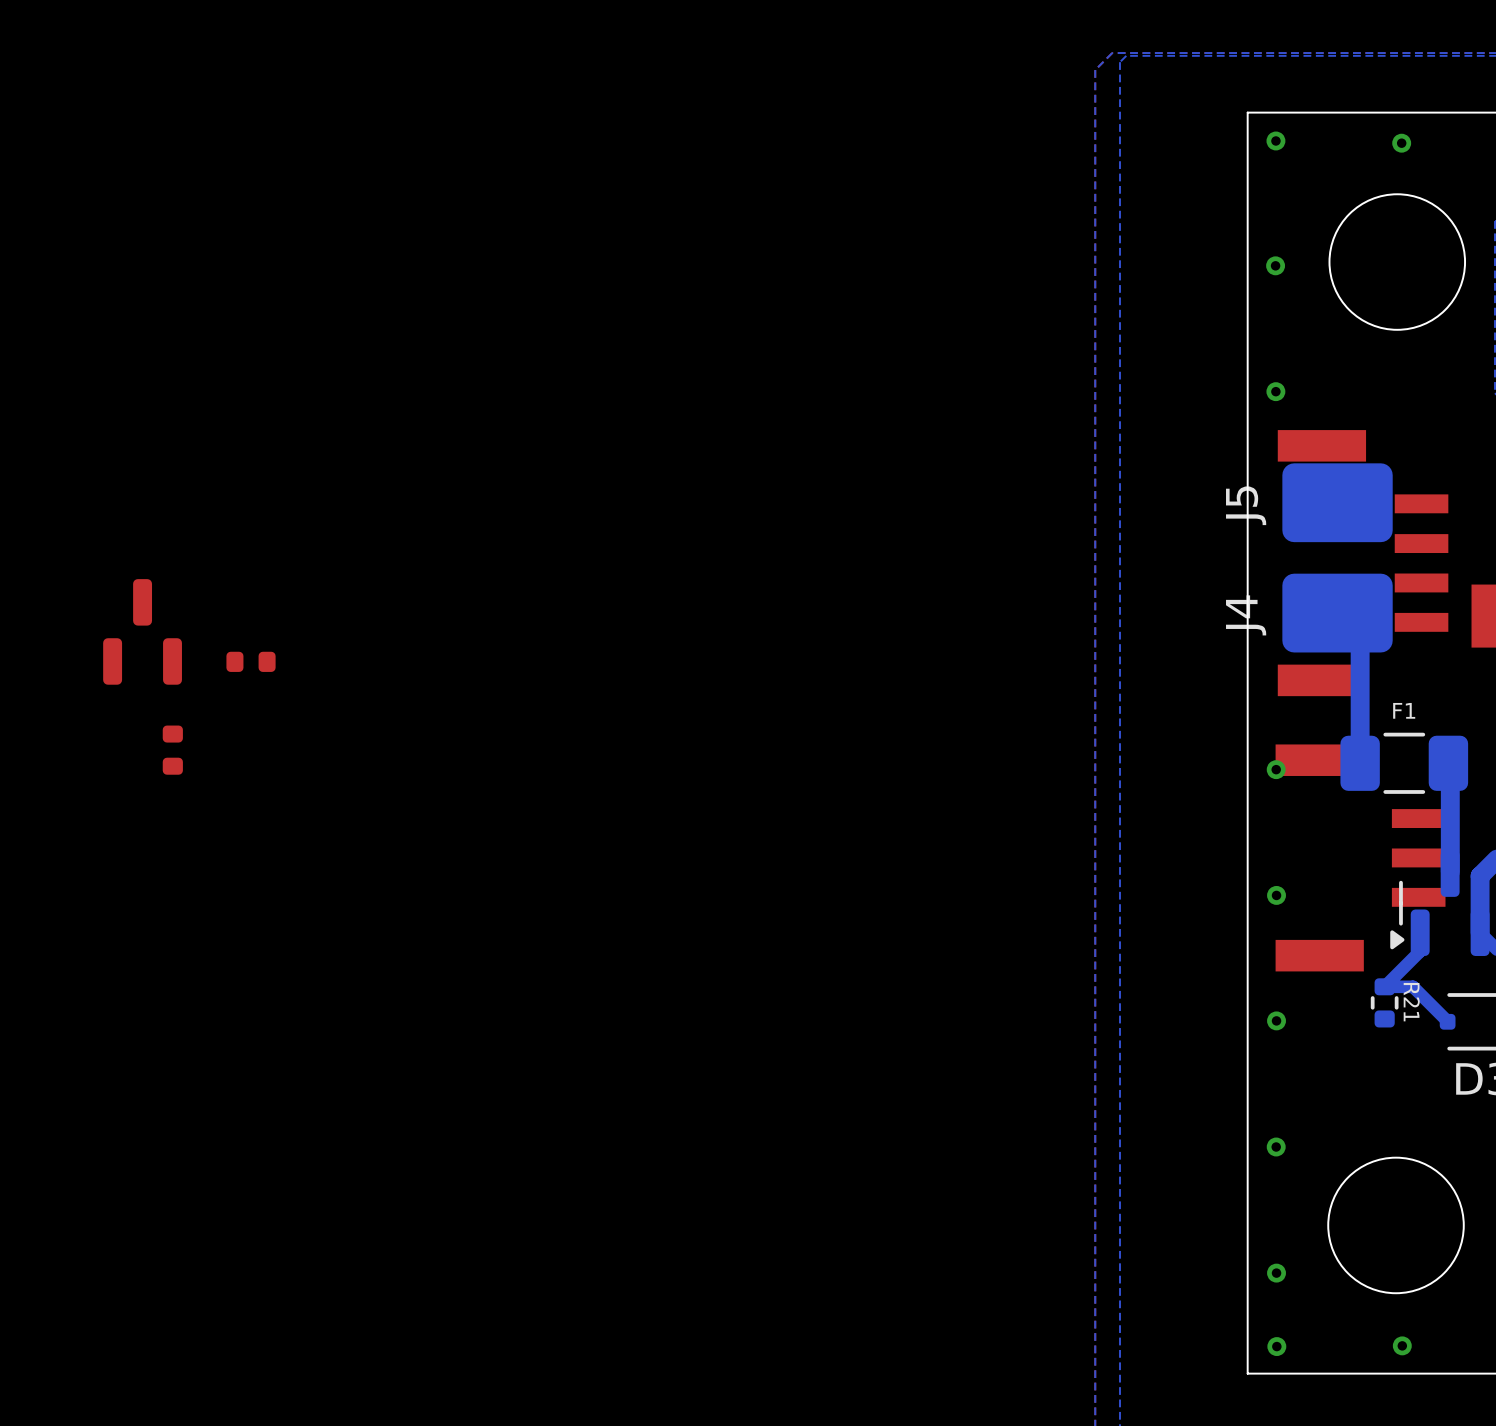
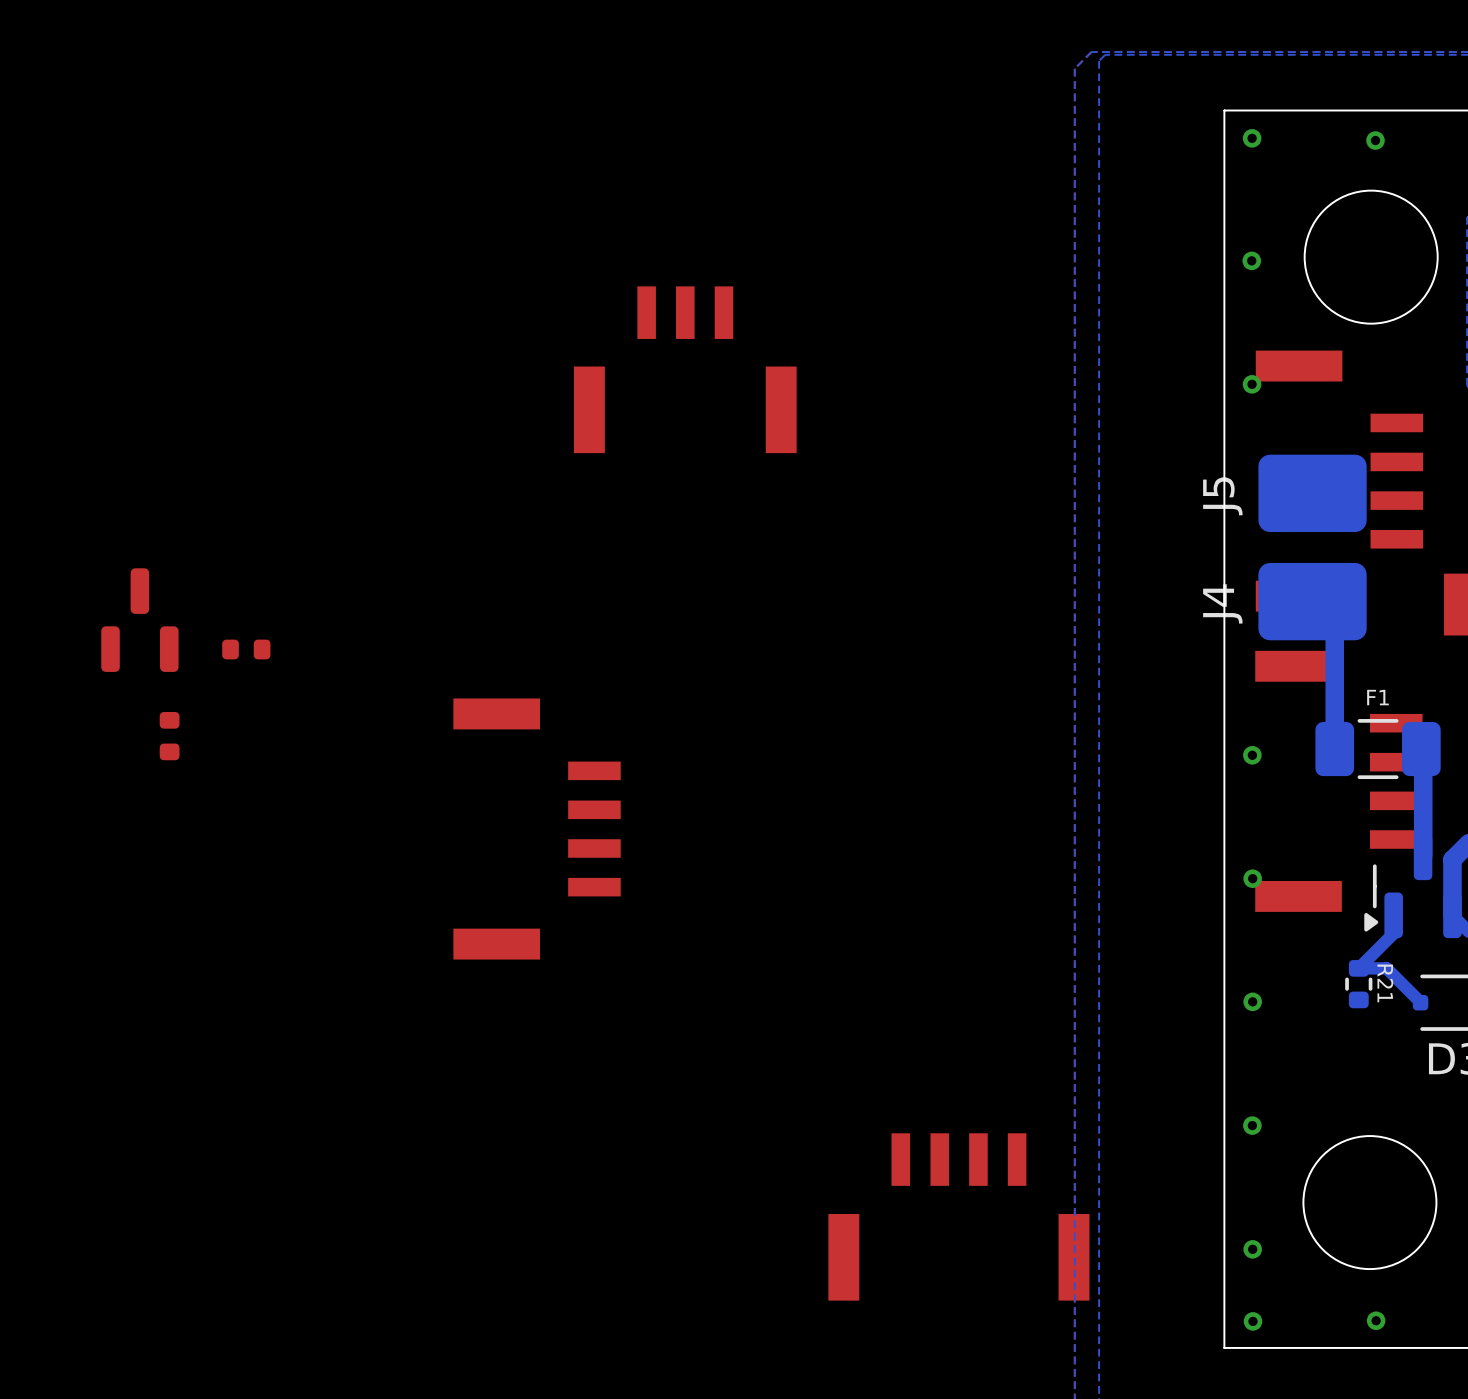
part: none -> (685, 369)
part position: (1363, 563) -> (1339, 481)
part: none -> (1338, 781)
part: none -> (537, 829)
part: (1360, 857) -> none
part: none -> (958, 1216)

